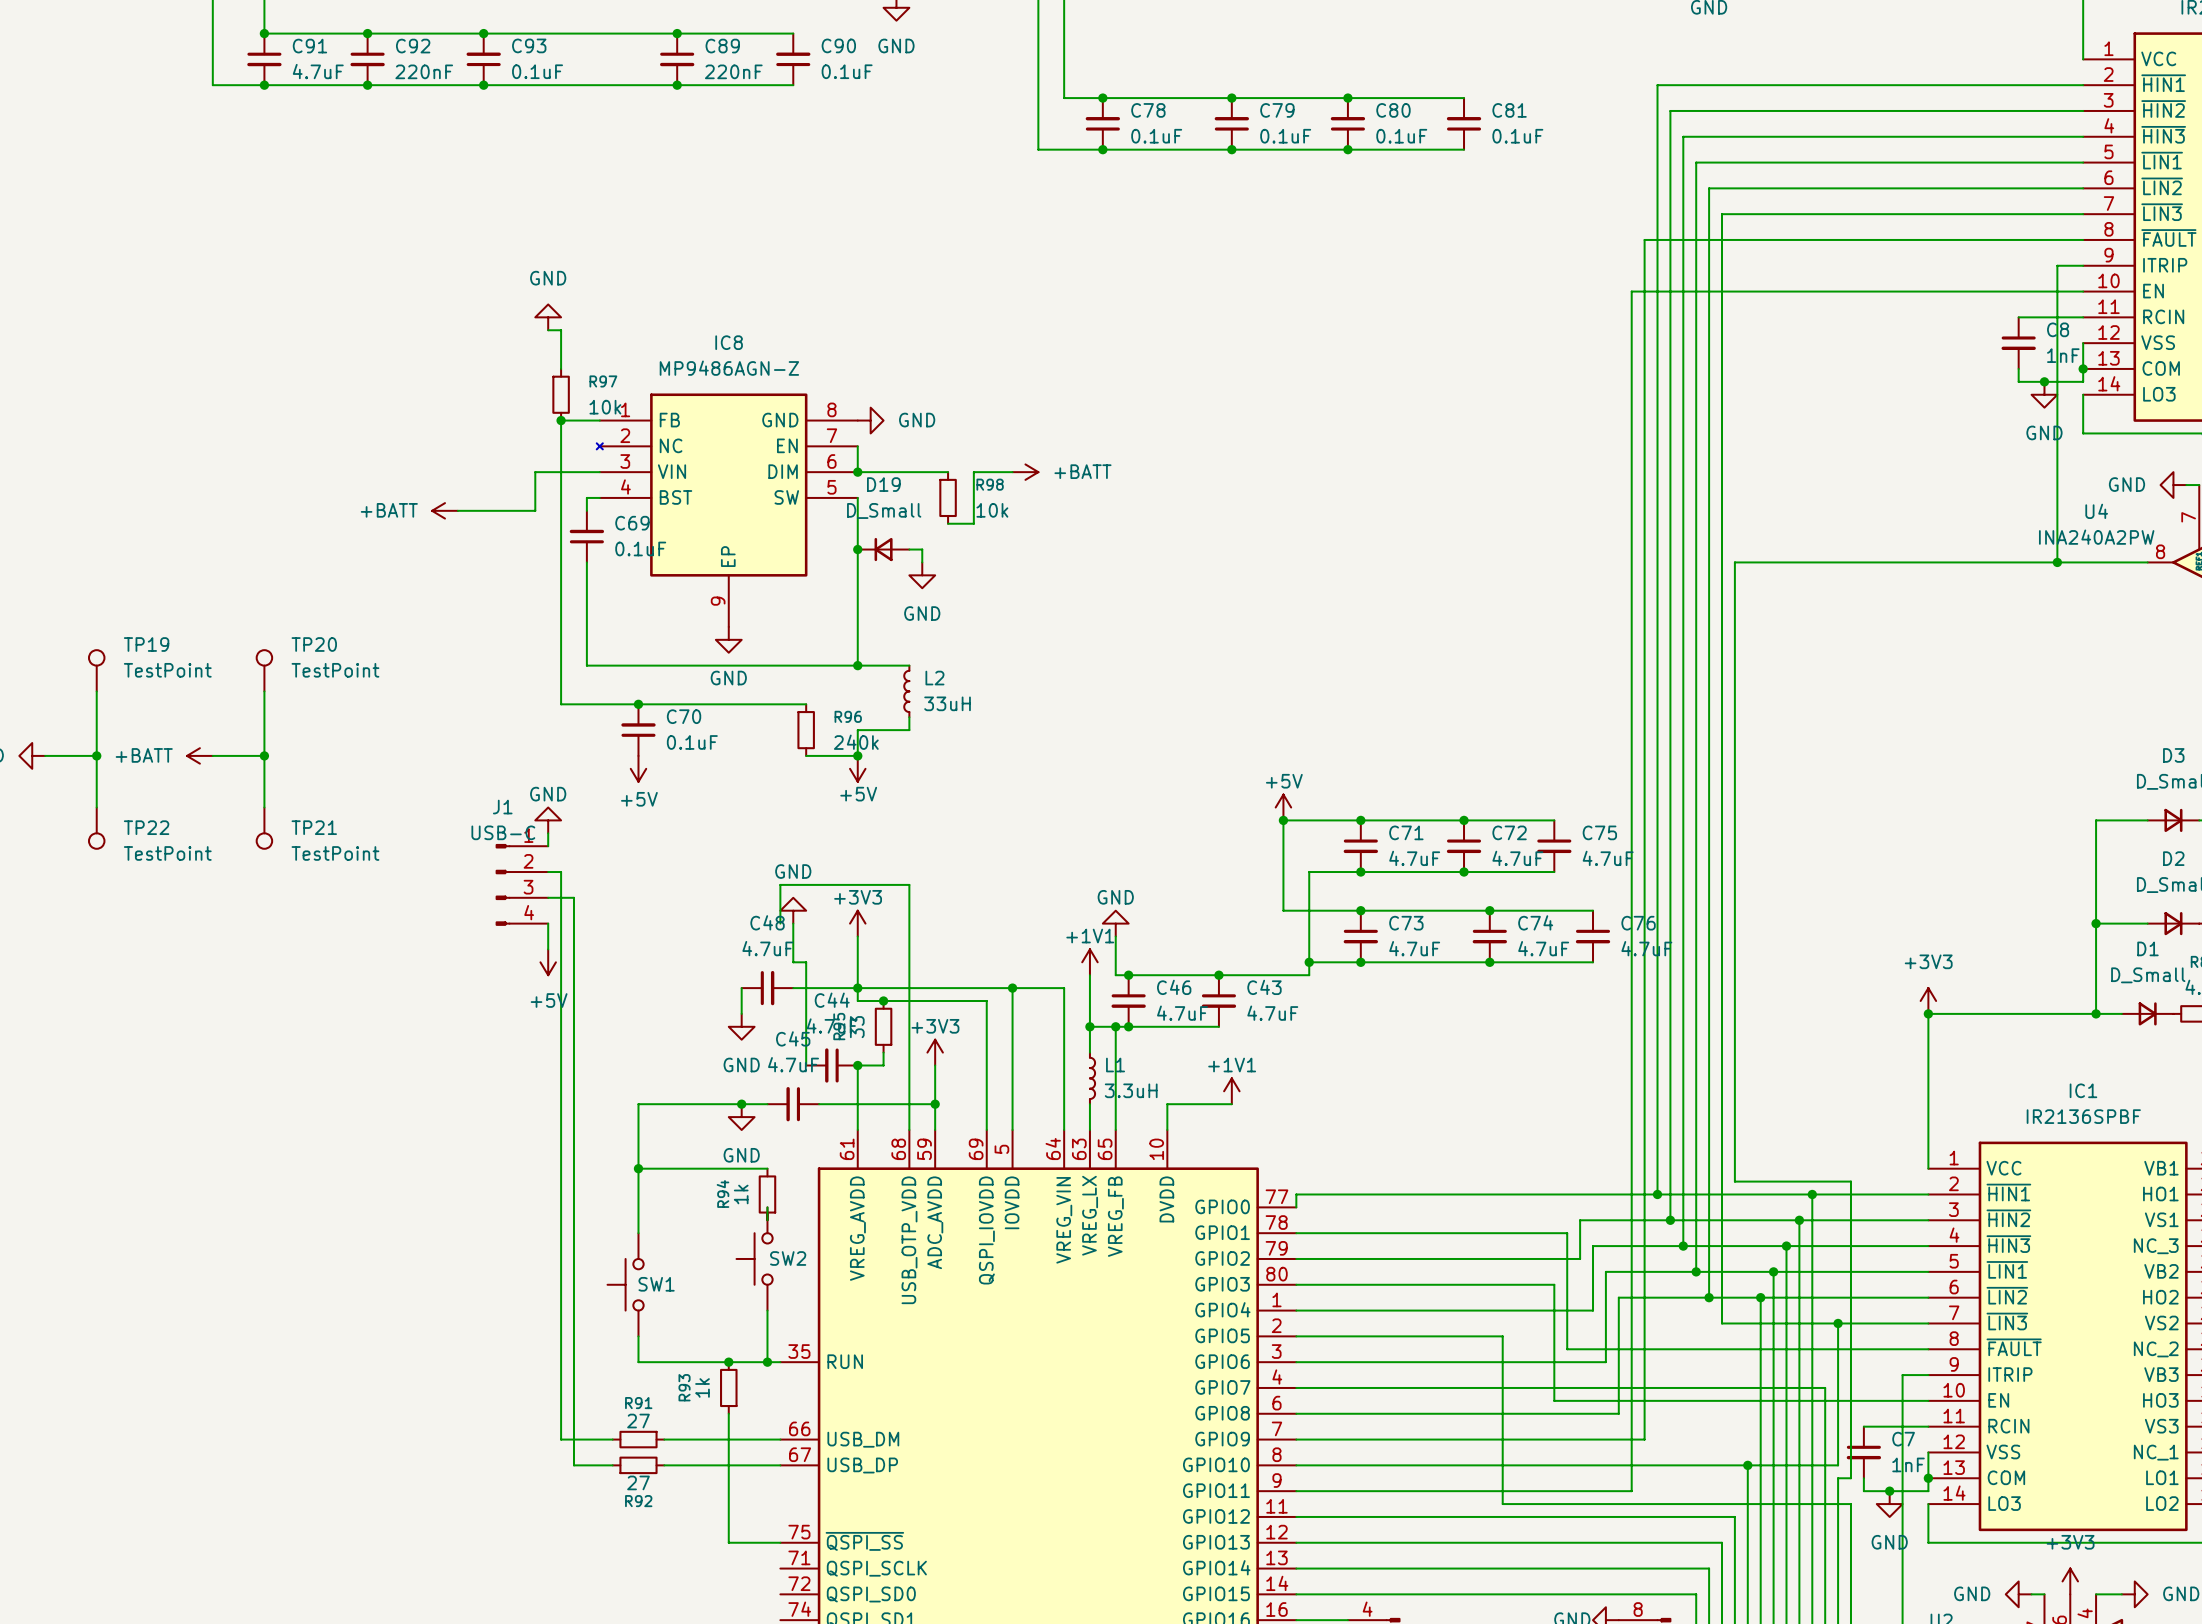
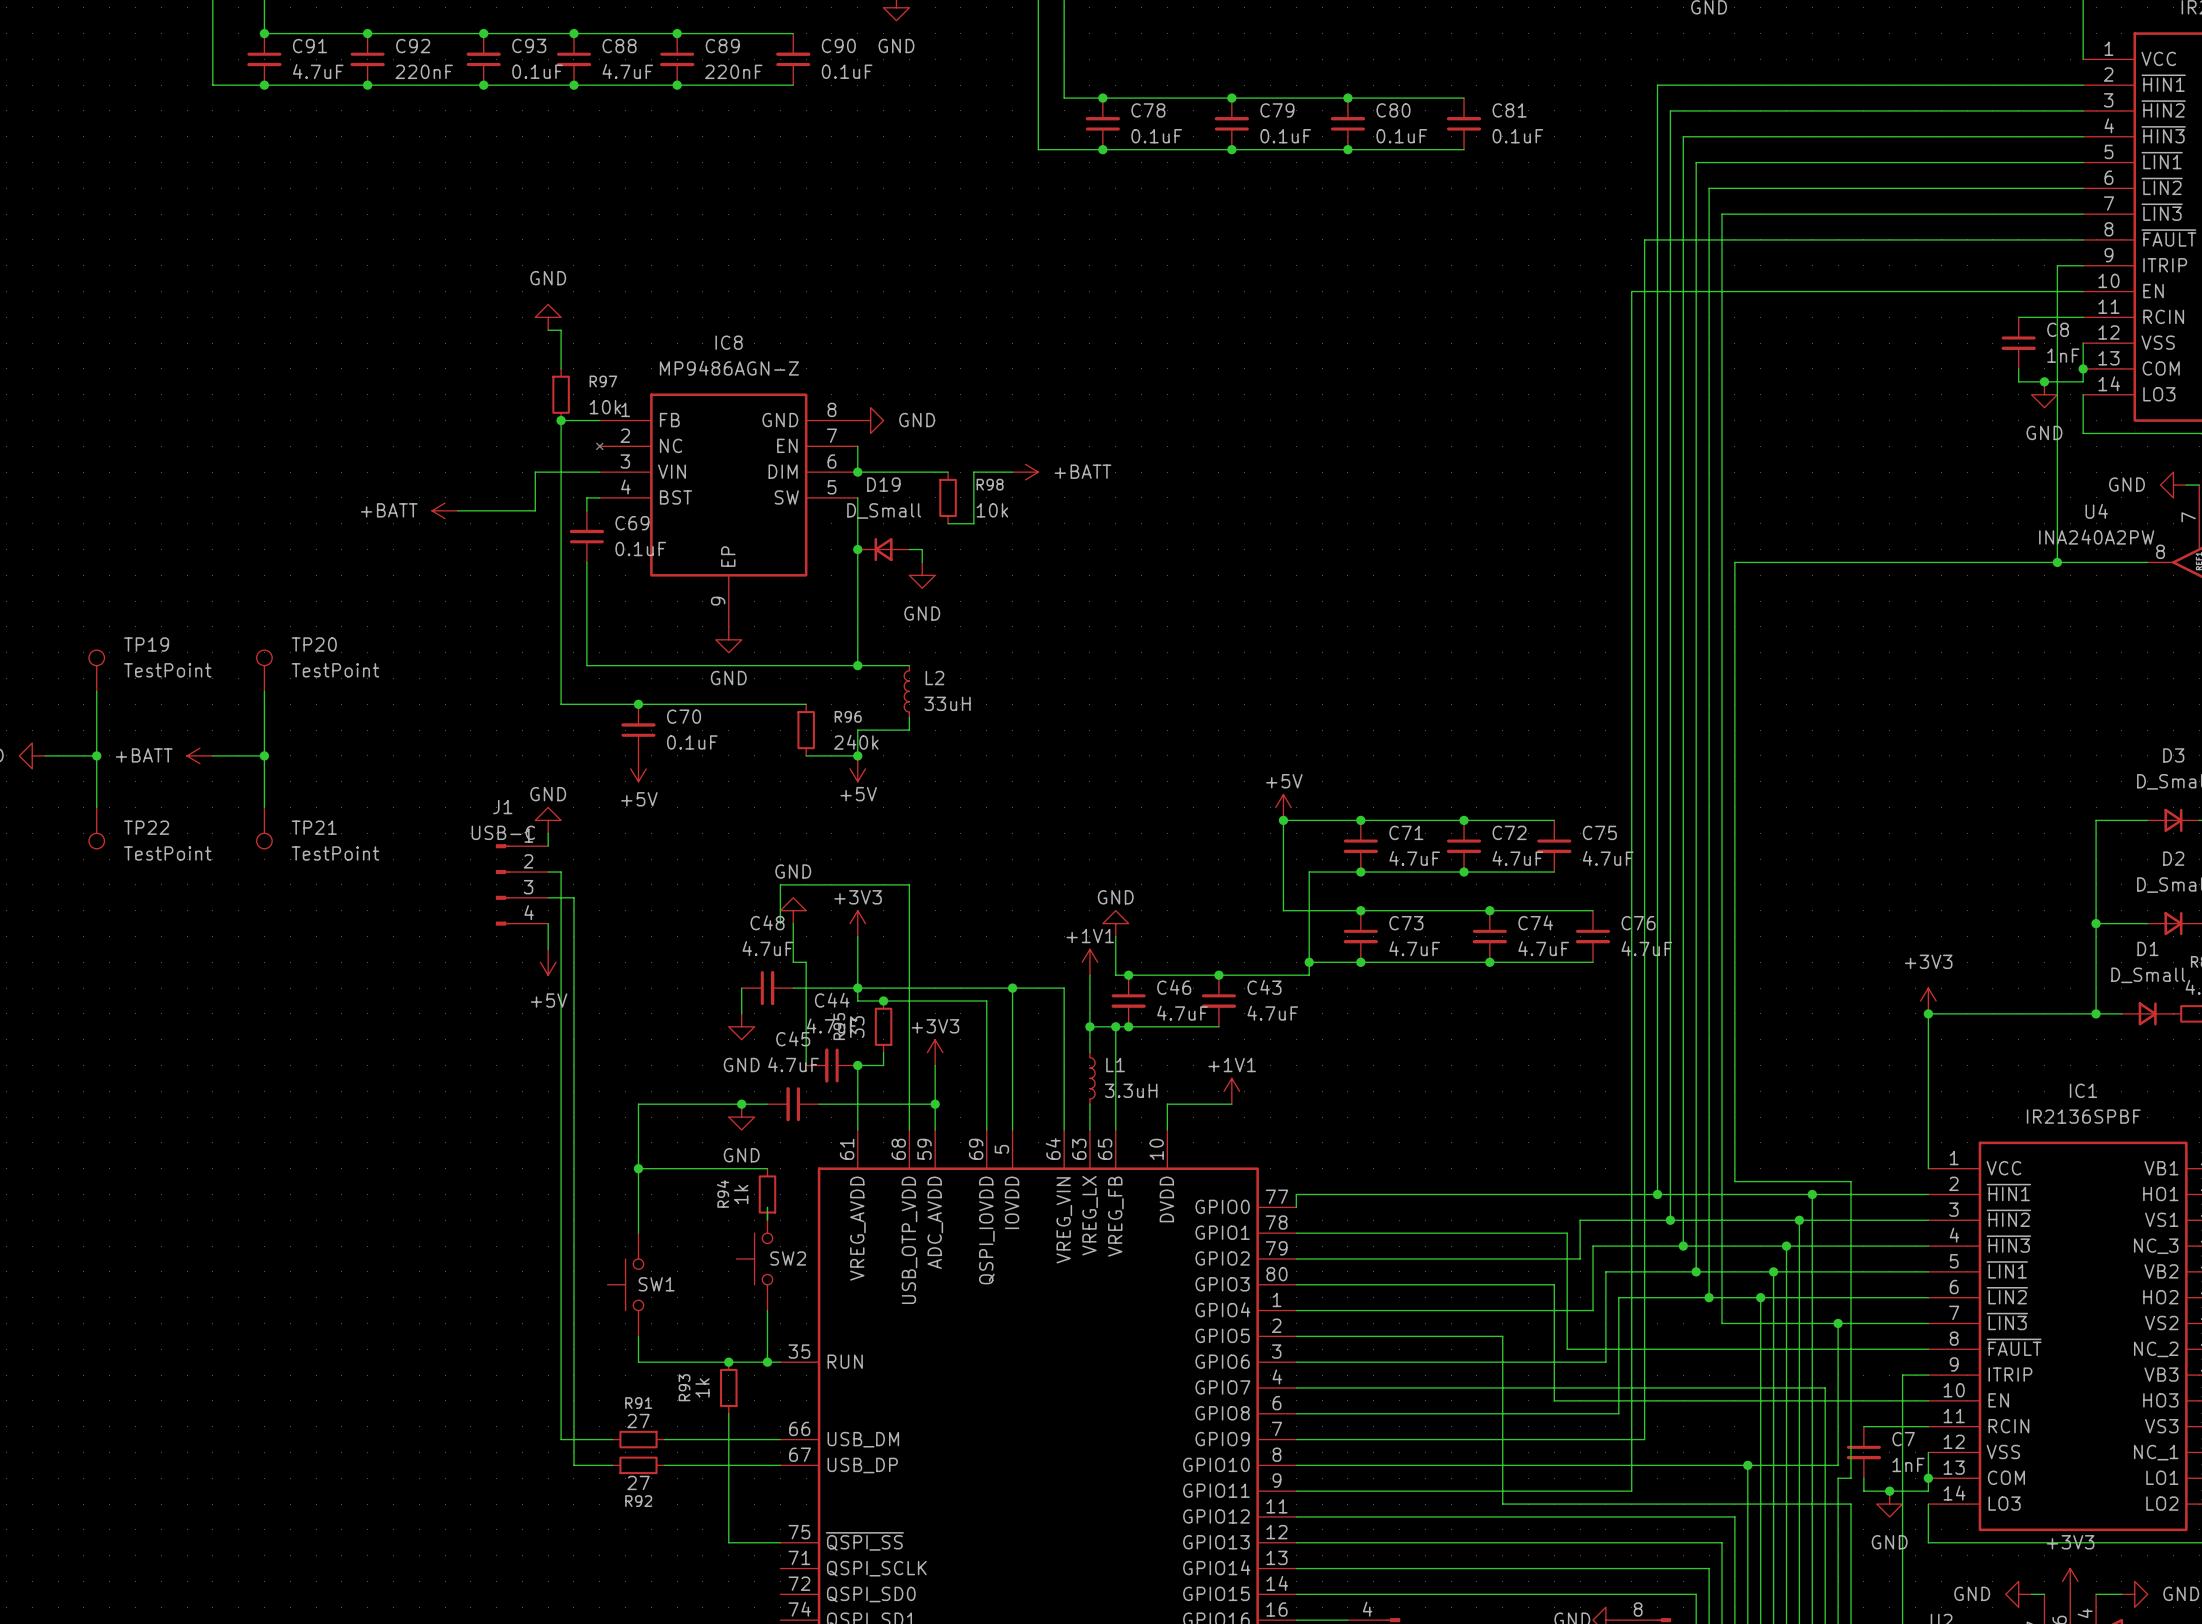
junction: none -> (573, 33)
C88: none -> 4.7uF (573, 59)
junction: none -> (573, 85)

